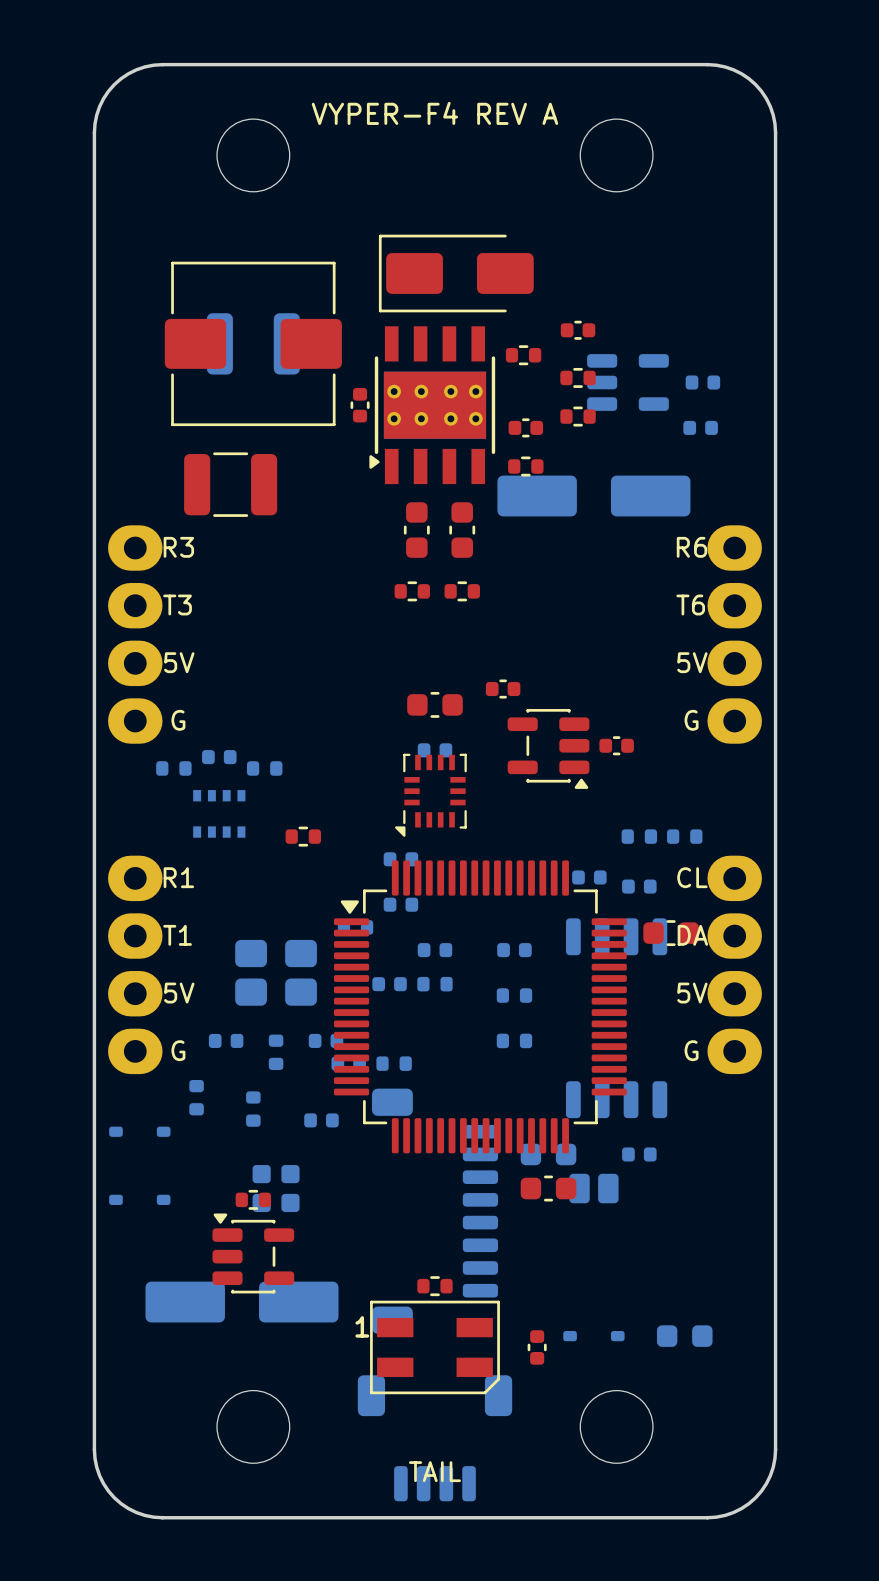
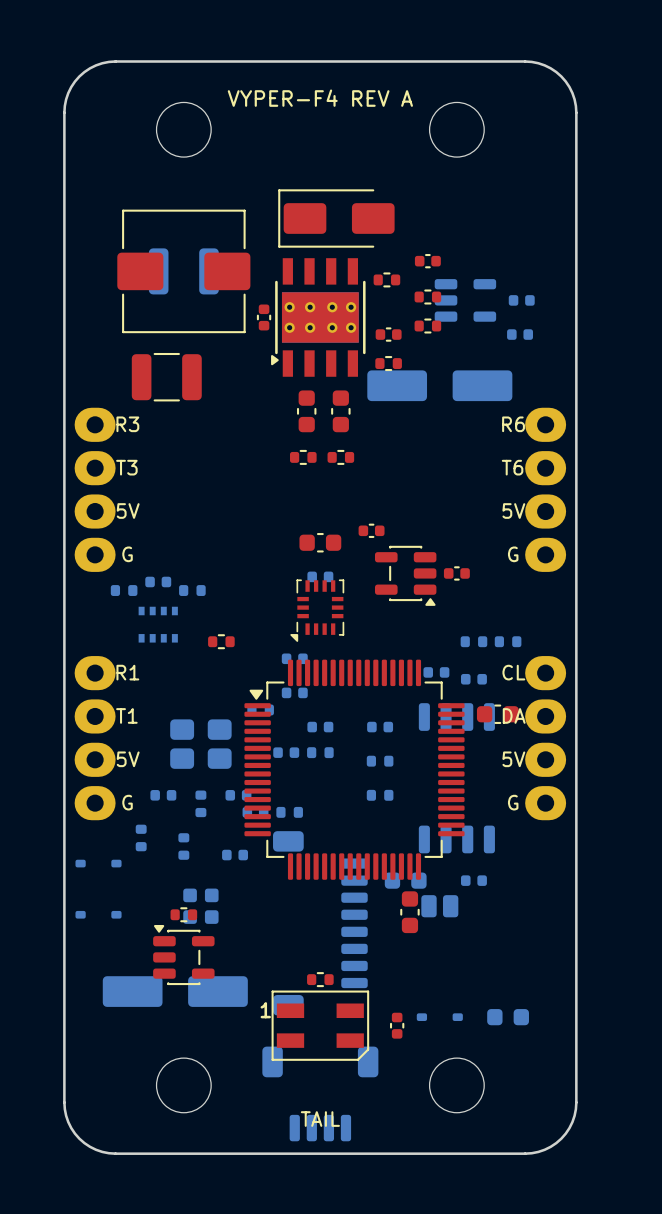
part rotation: 0° (548, 1188) -> 90° clockwise (409, 912)

